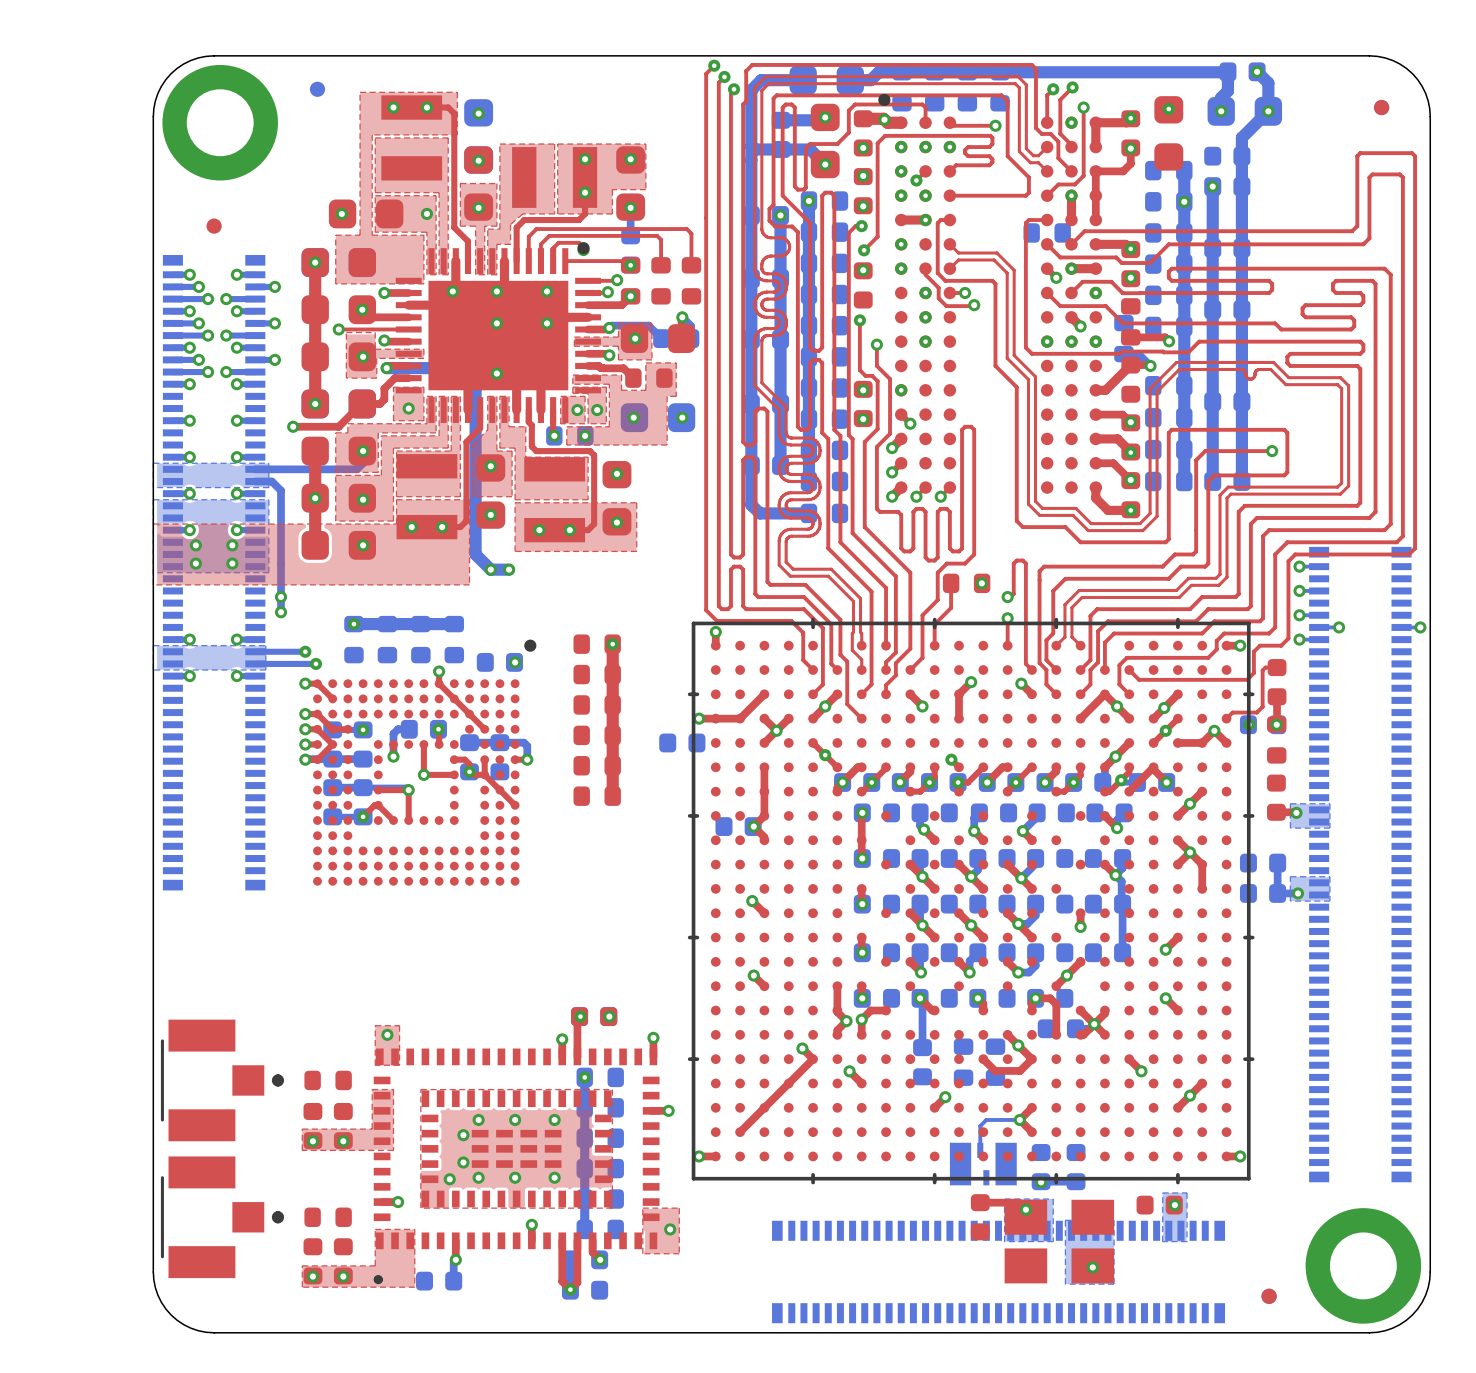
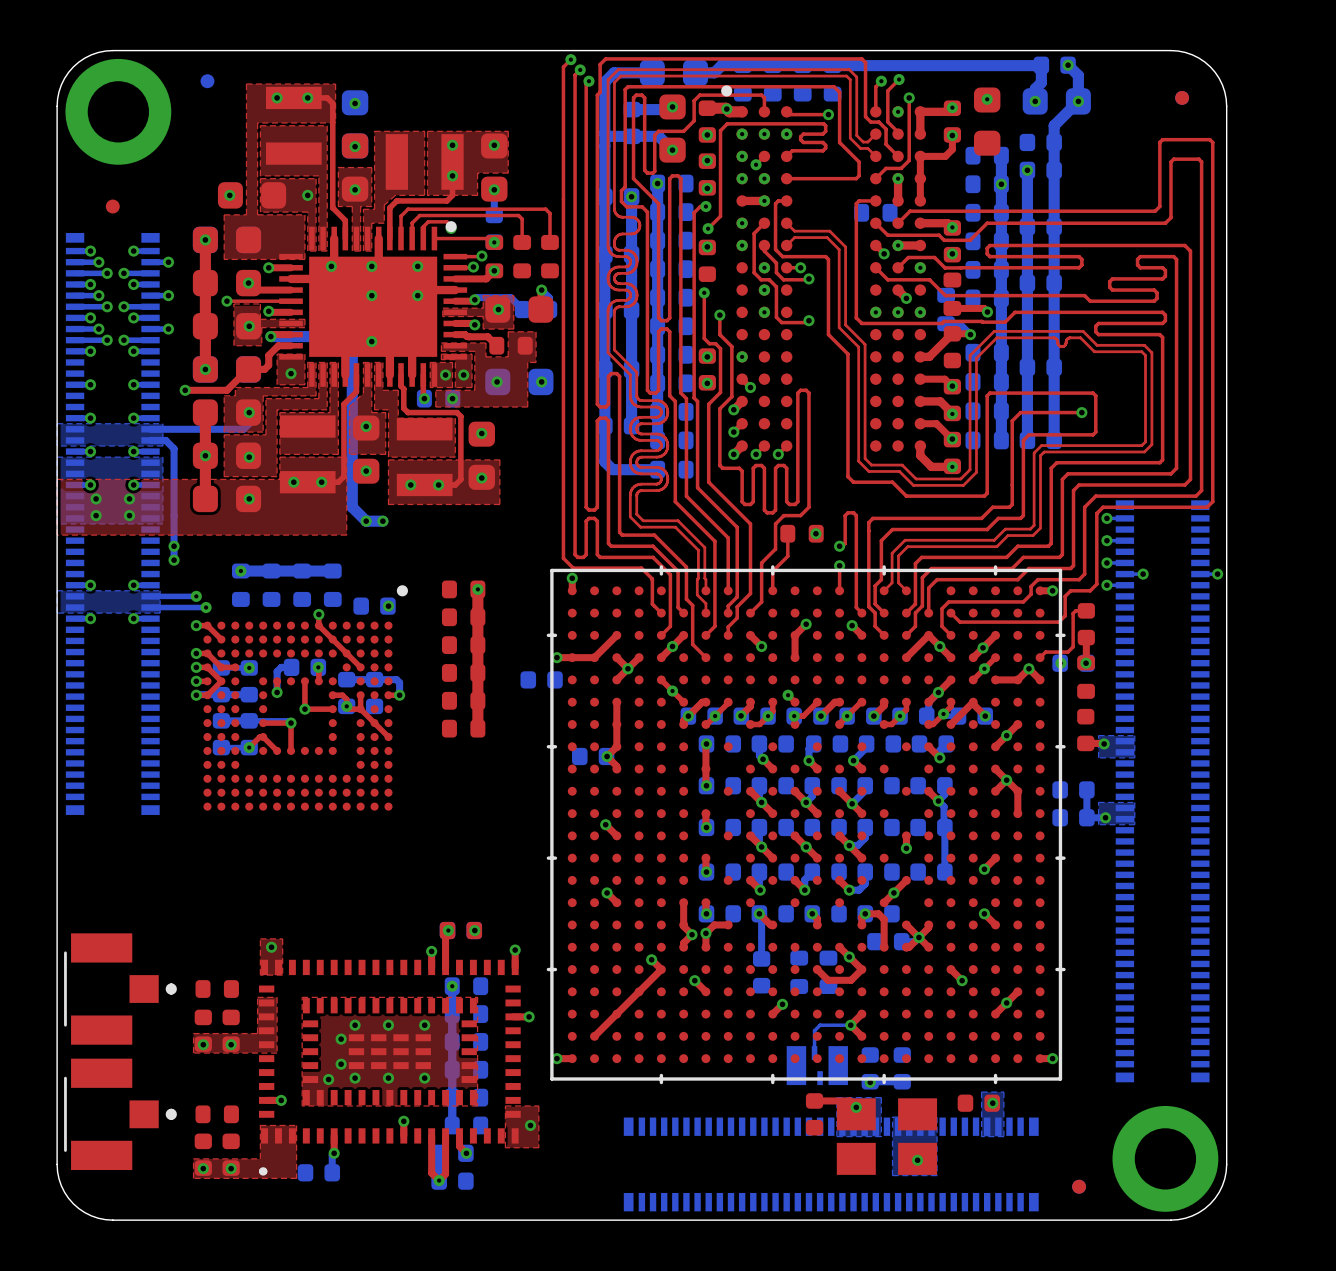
top track: none -> (764, 223) (754, 233) (754, 272) (761, 279) (769, 279) (776, 286) (776, 317) (781, 322) (807, 322) (808, 320)
via: none -> (808, 320)

